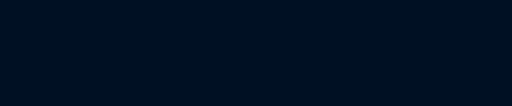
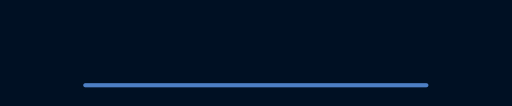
bottom track: none -> (85, 85) (426, 85)

